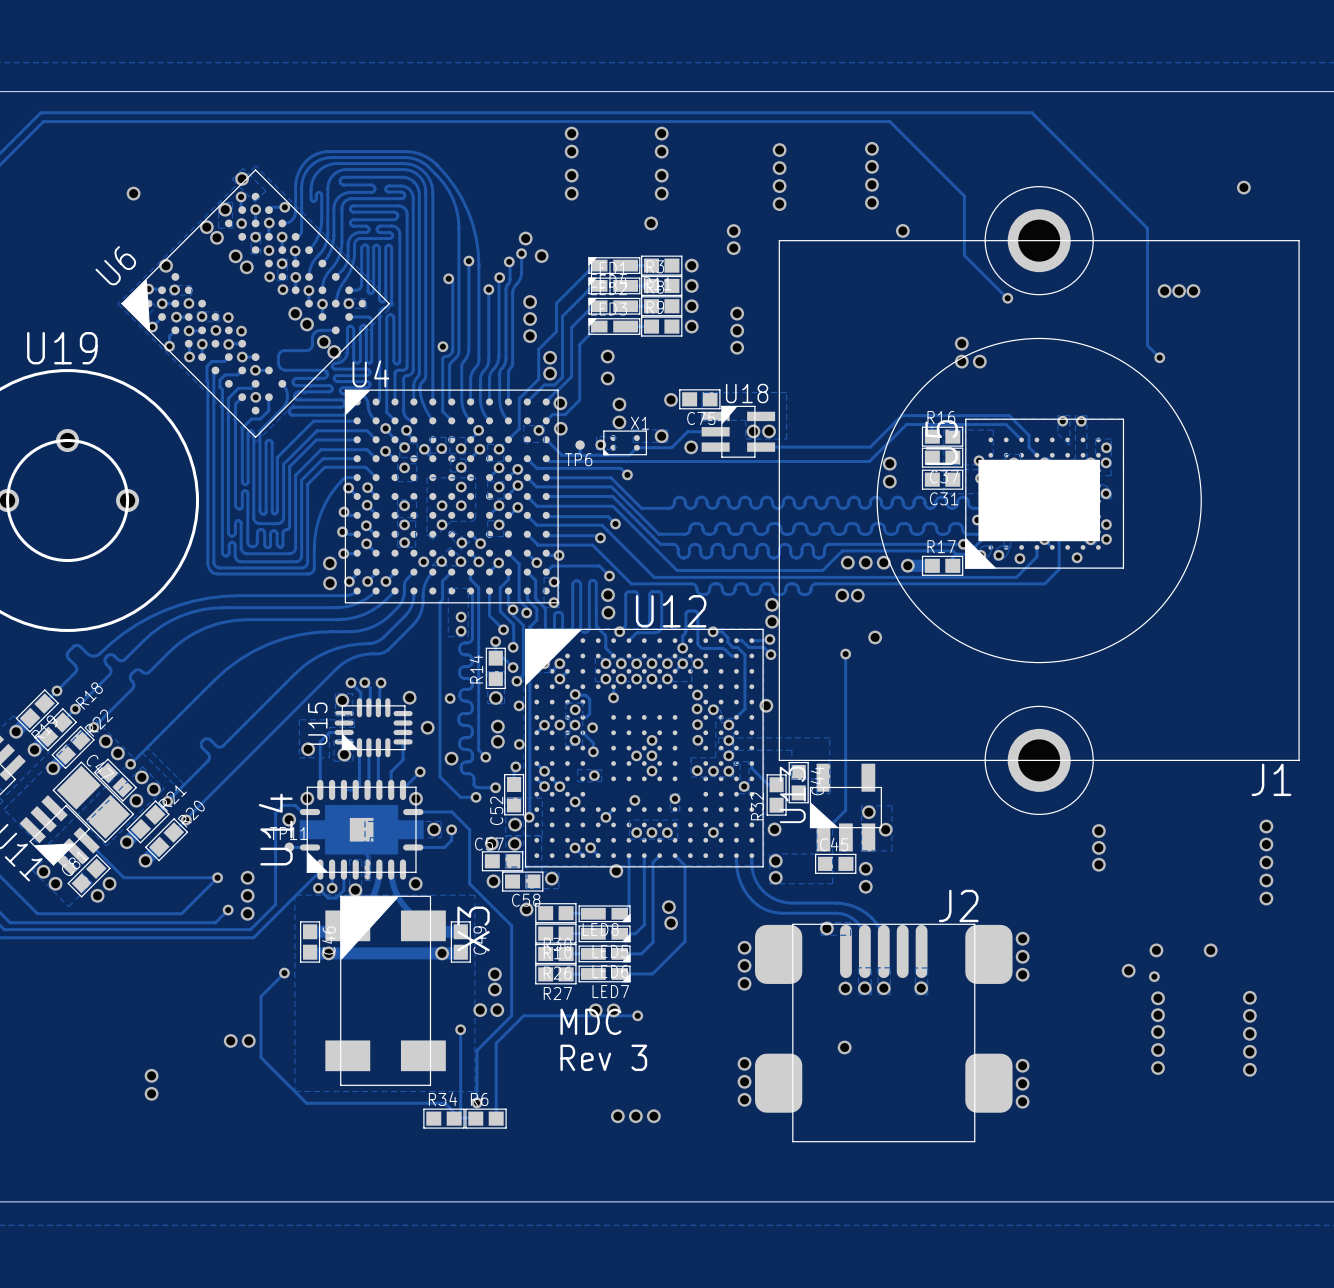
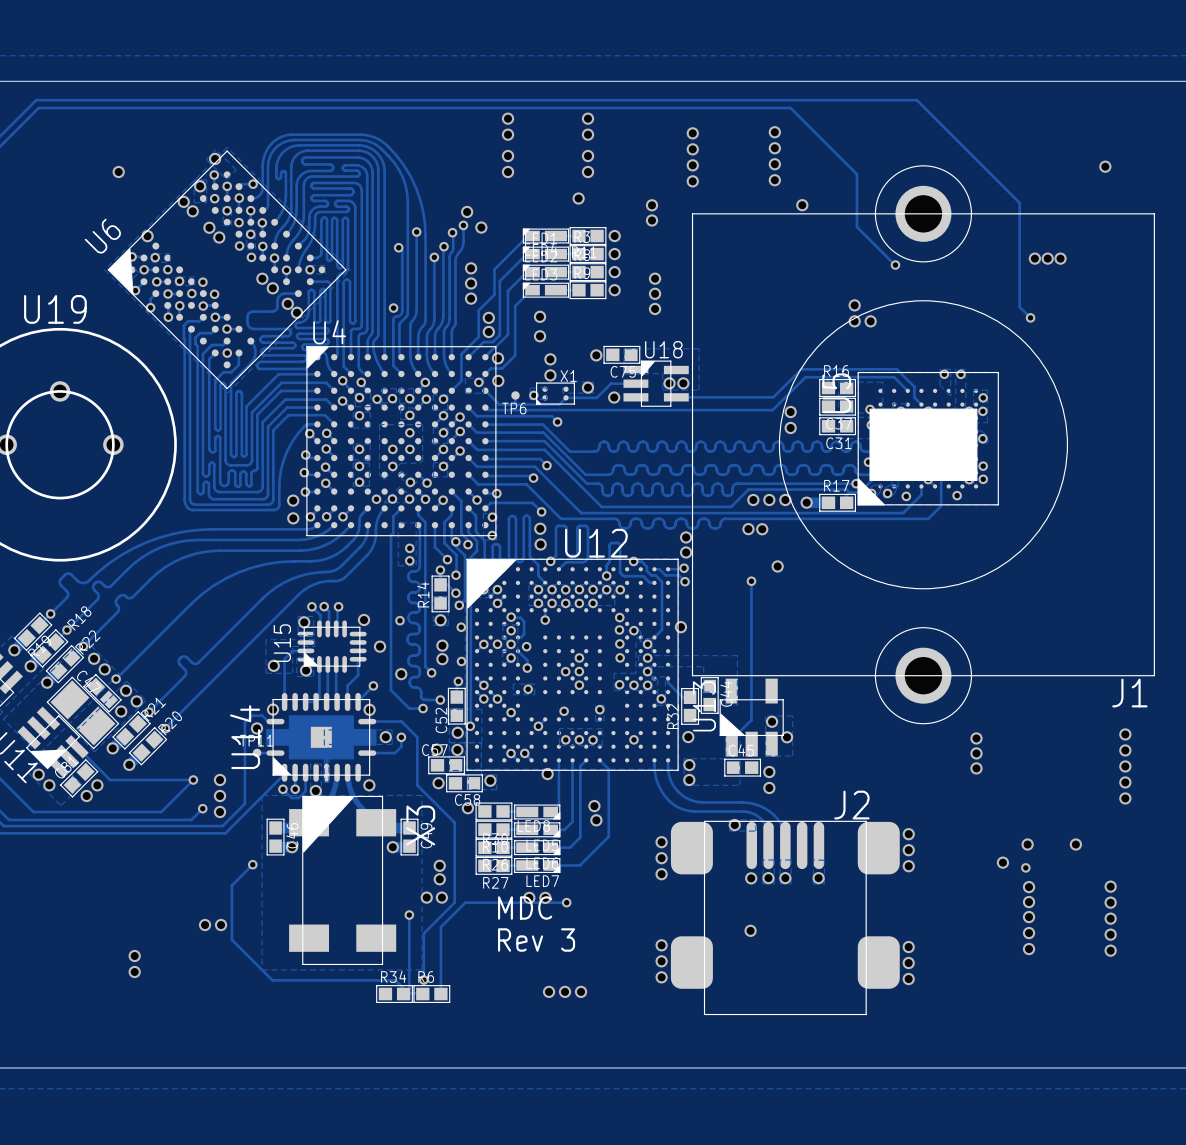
zone outline: (147, 747) (183, 784) (178, 789) (142, 752) (147, 747) -> none
track: (328, 953) (442, 953) -> none

